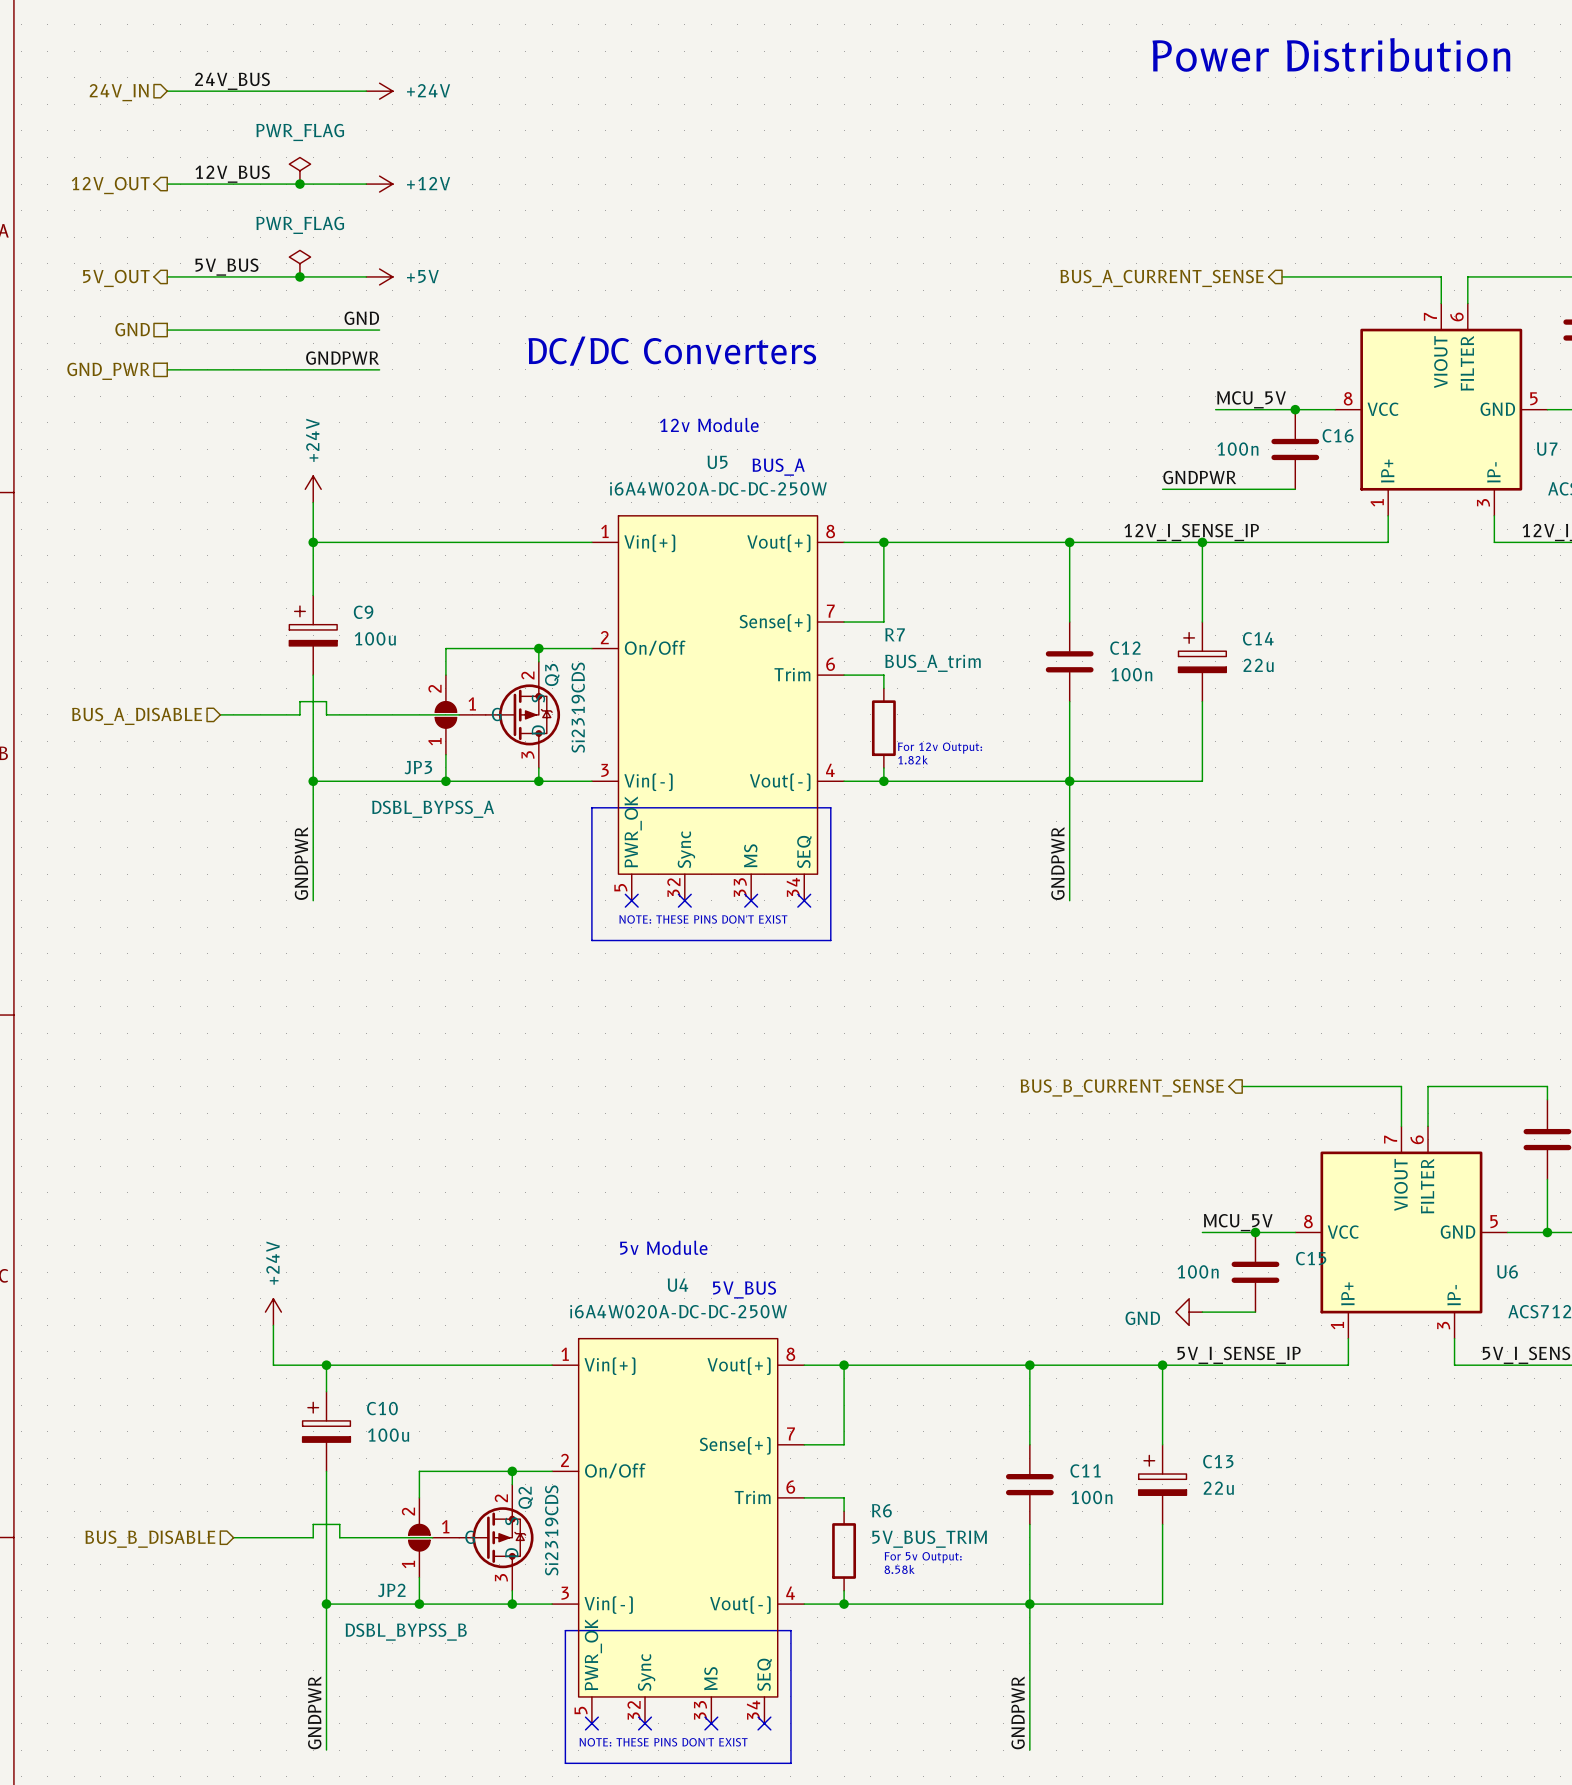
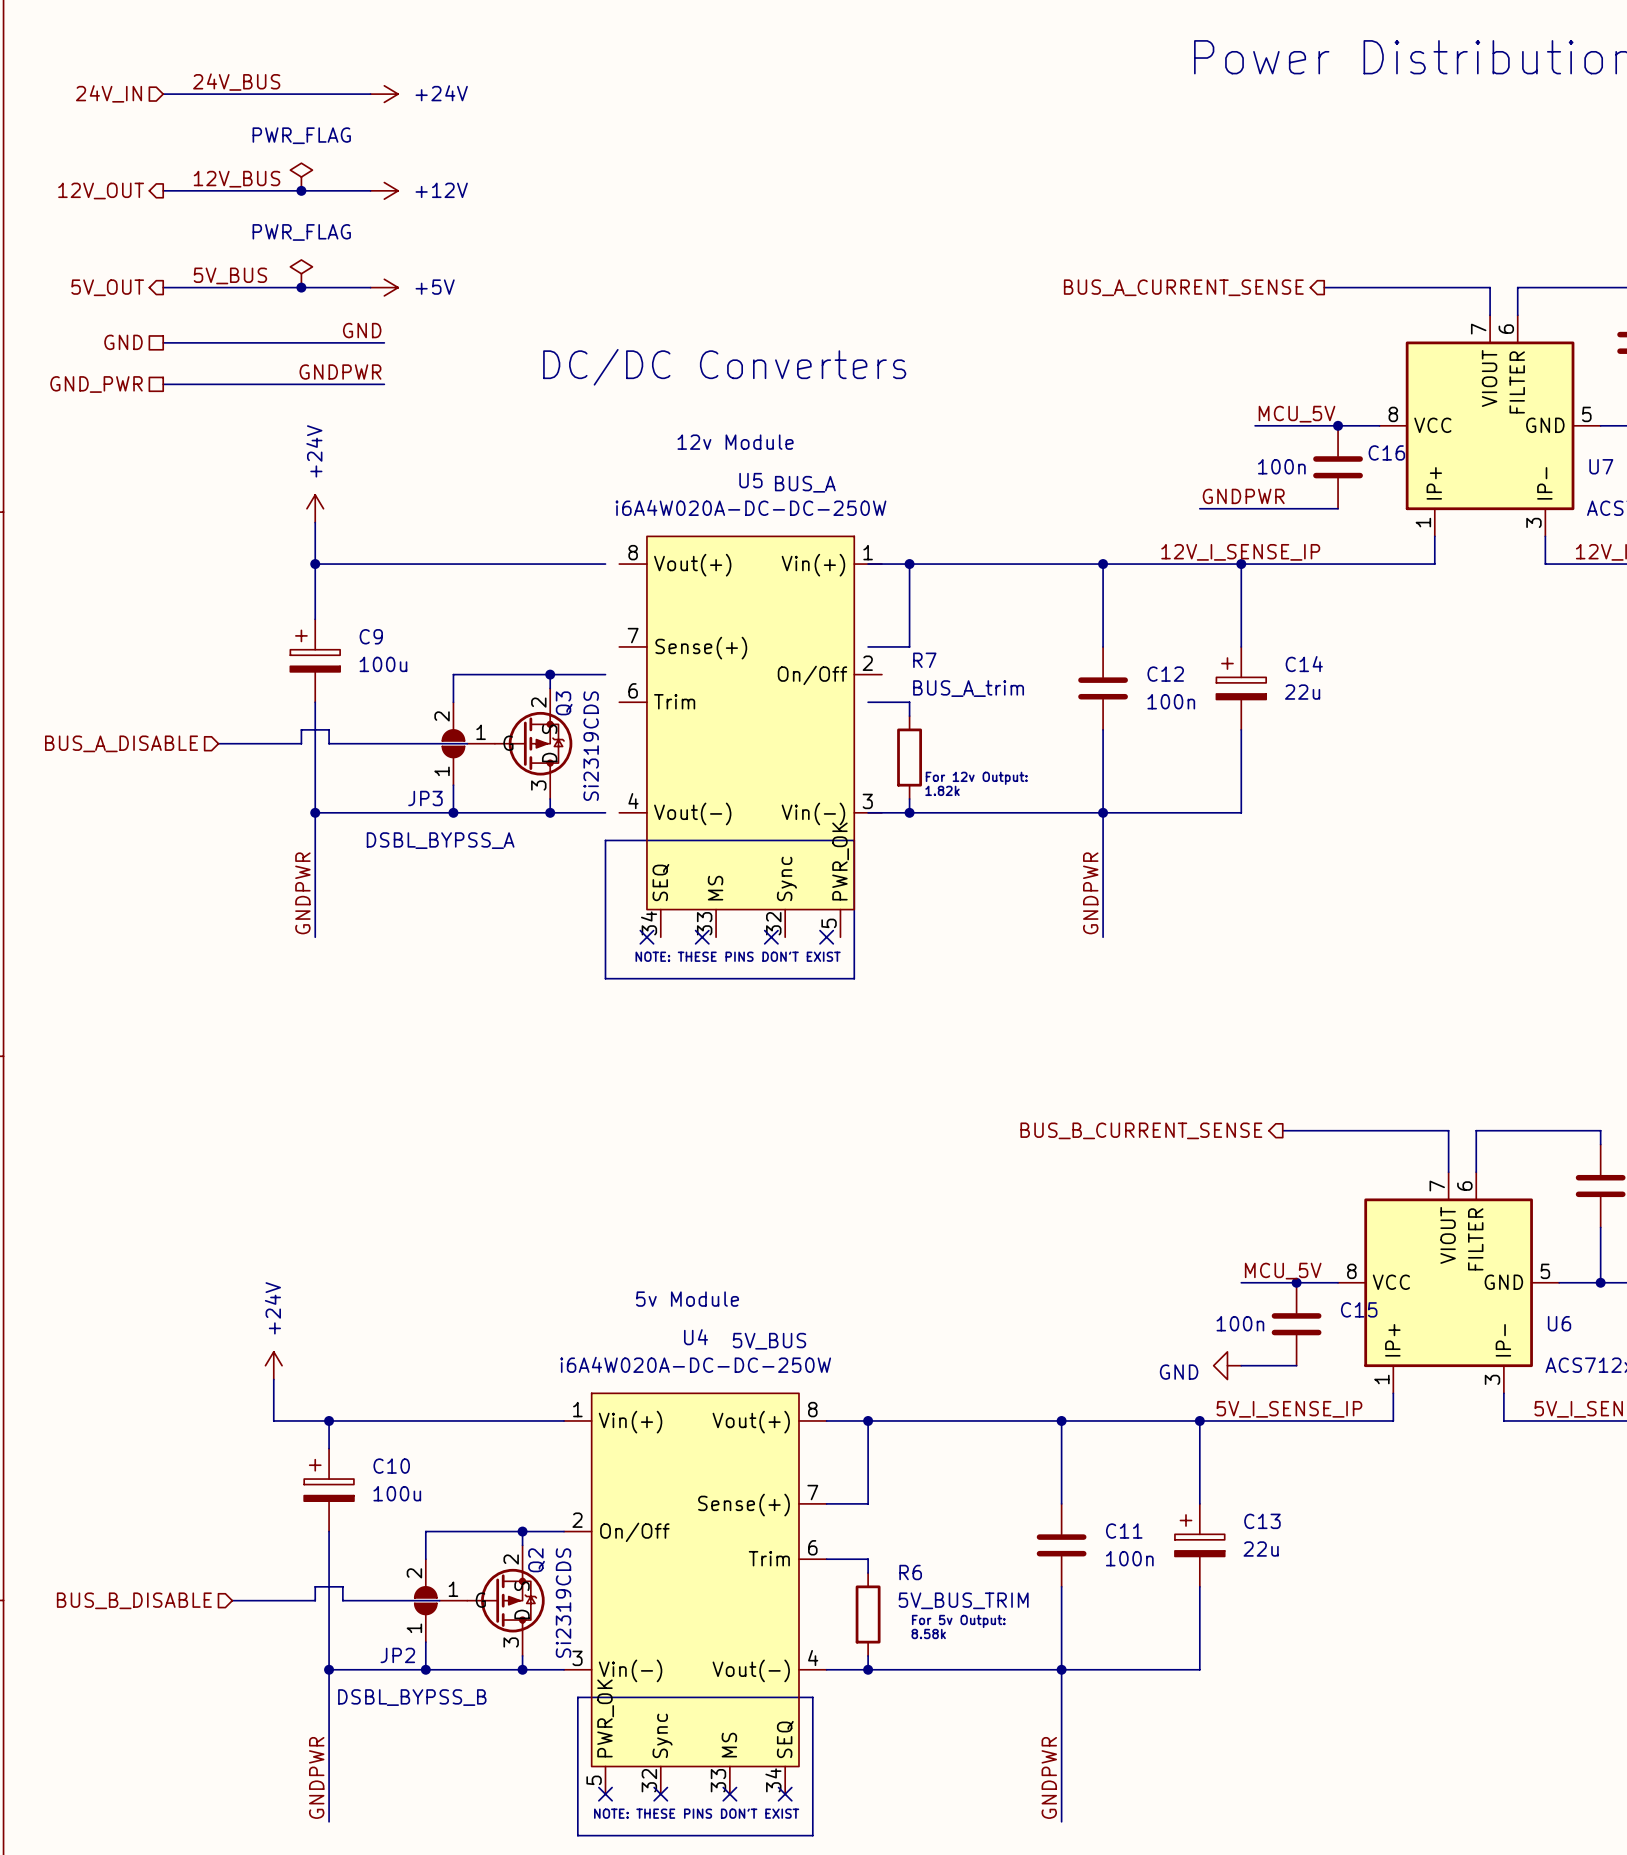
U5 flip: as is (717, 695) -> left-right (750, 722)

